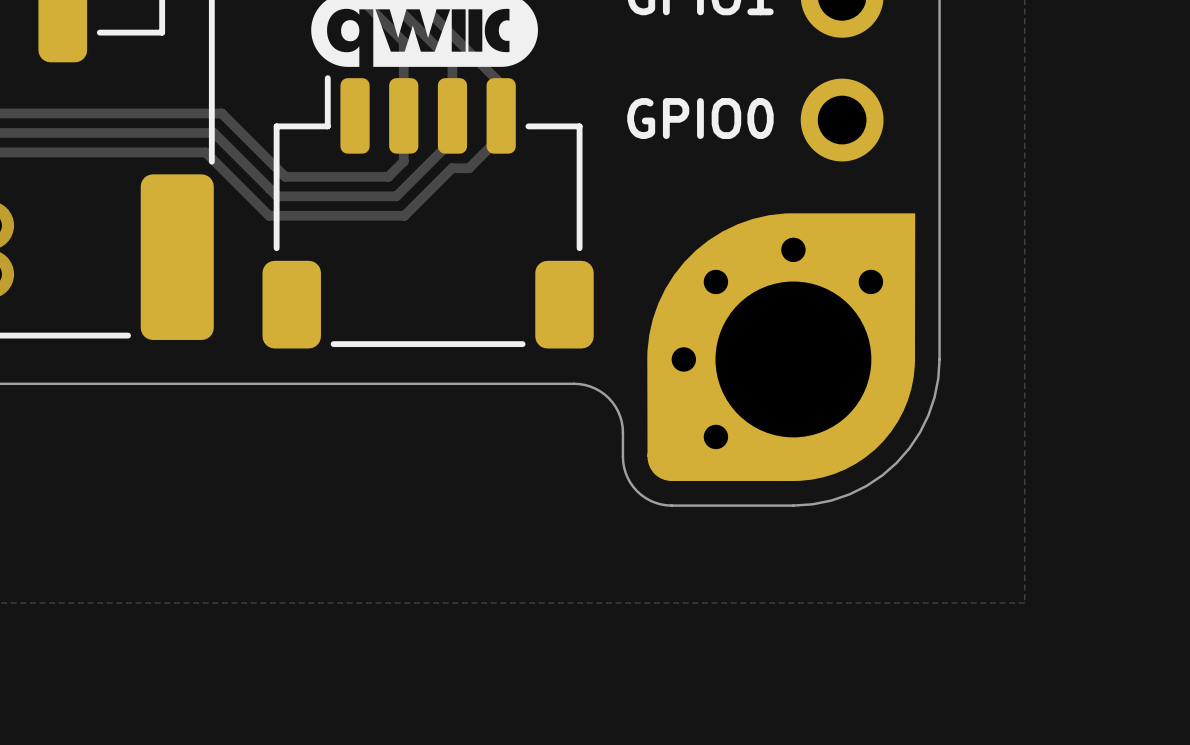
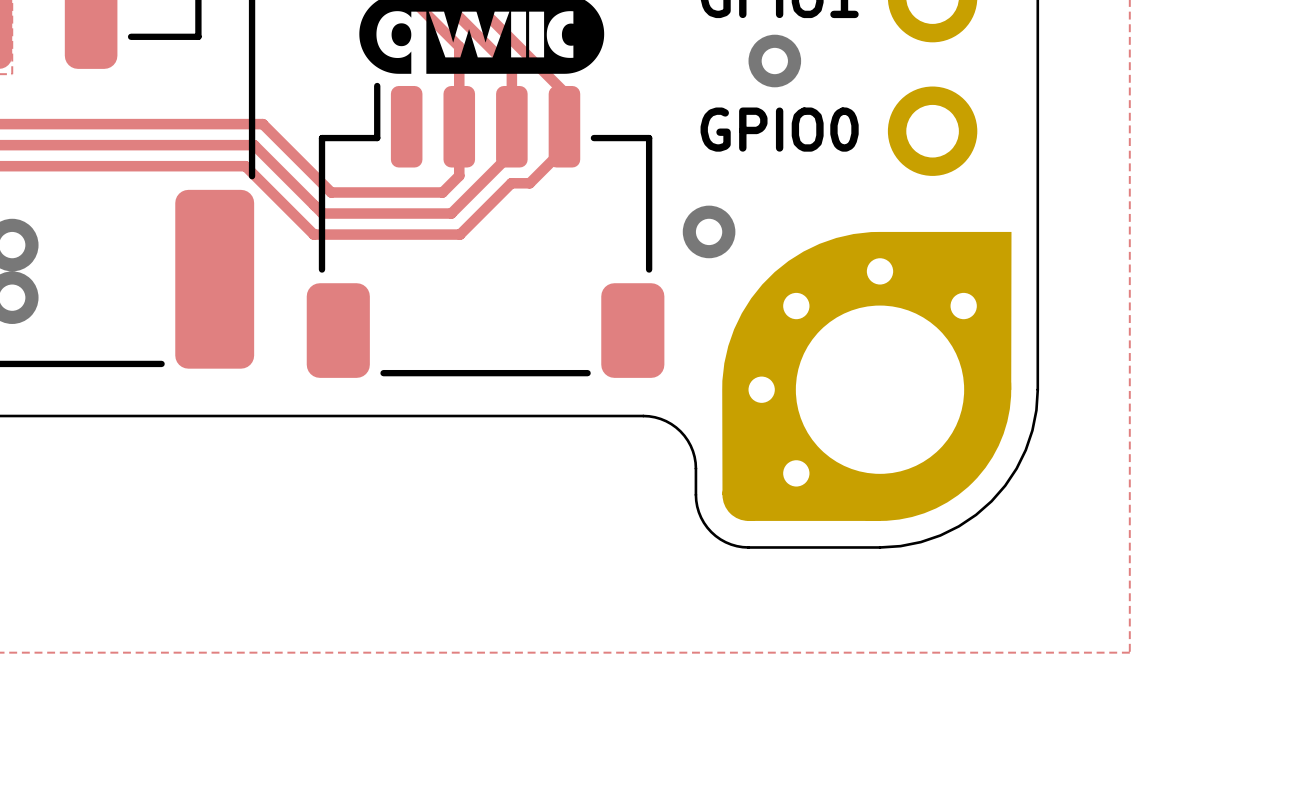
via: none -> (774, 61)
via: none -> (709, 231)

